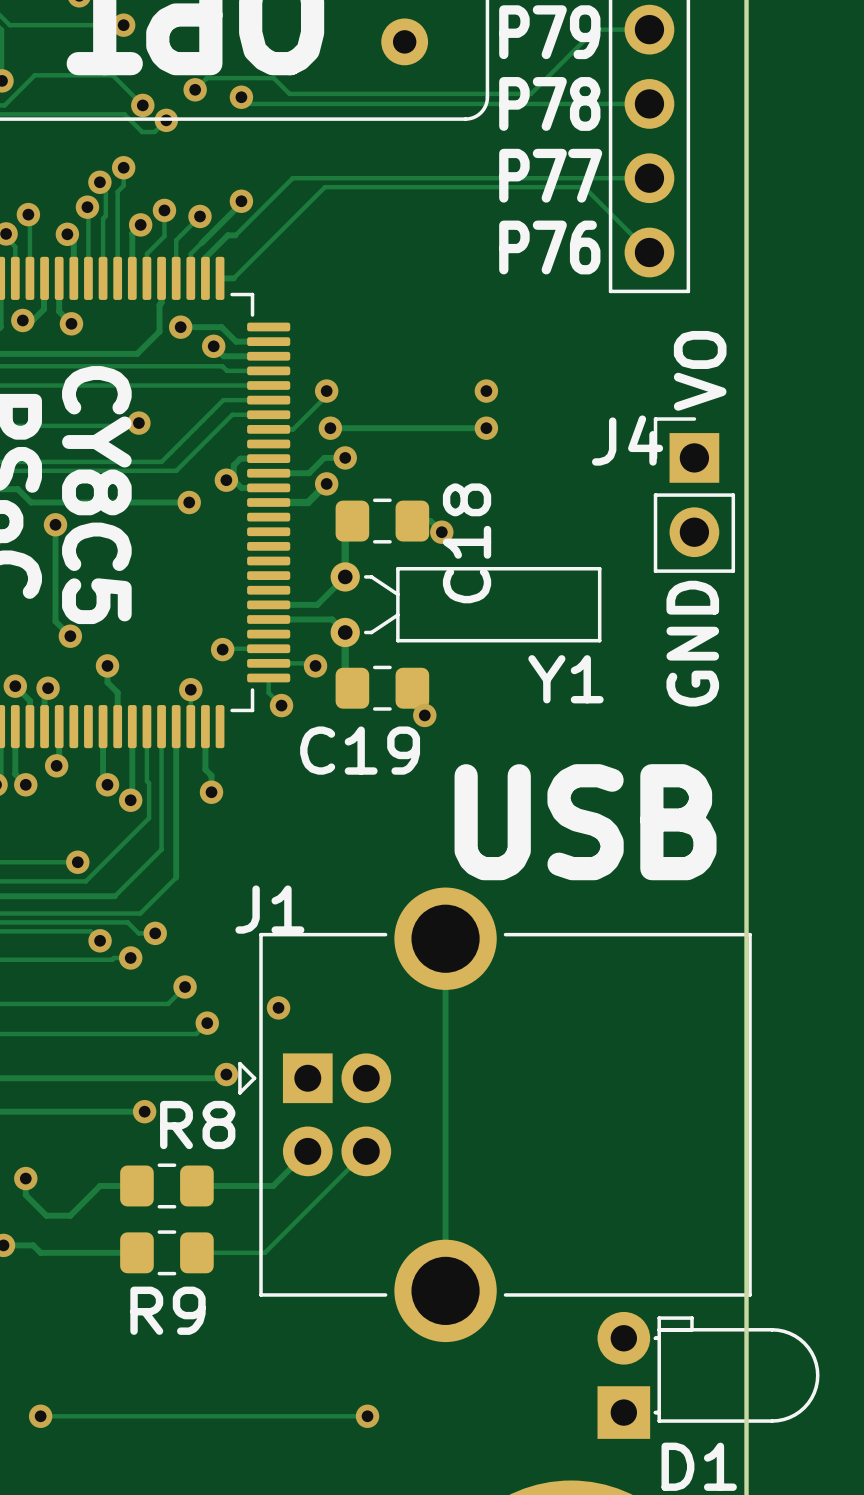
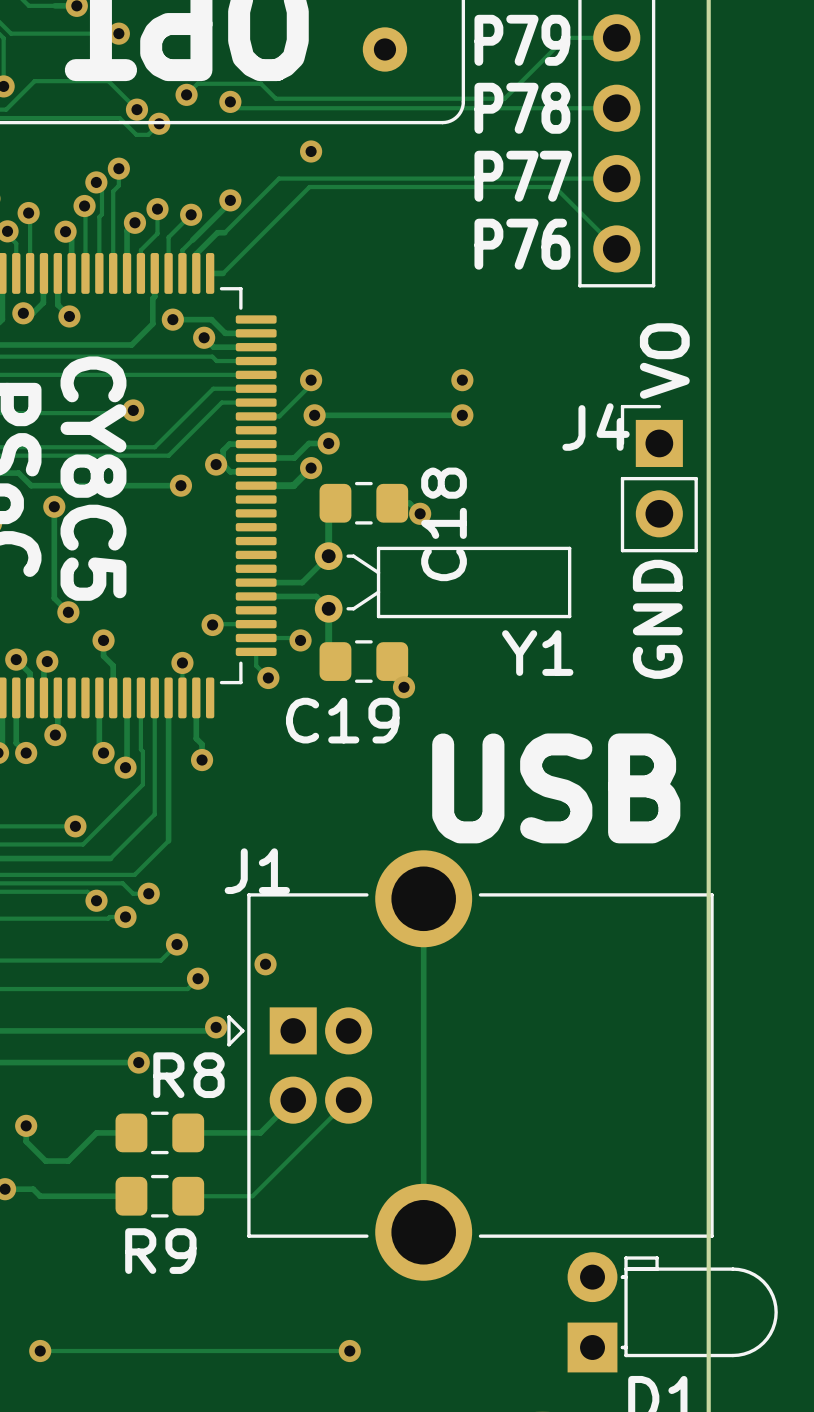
via: none -> (311, 151)

